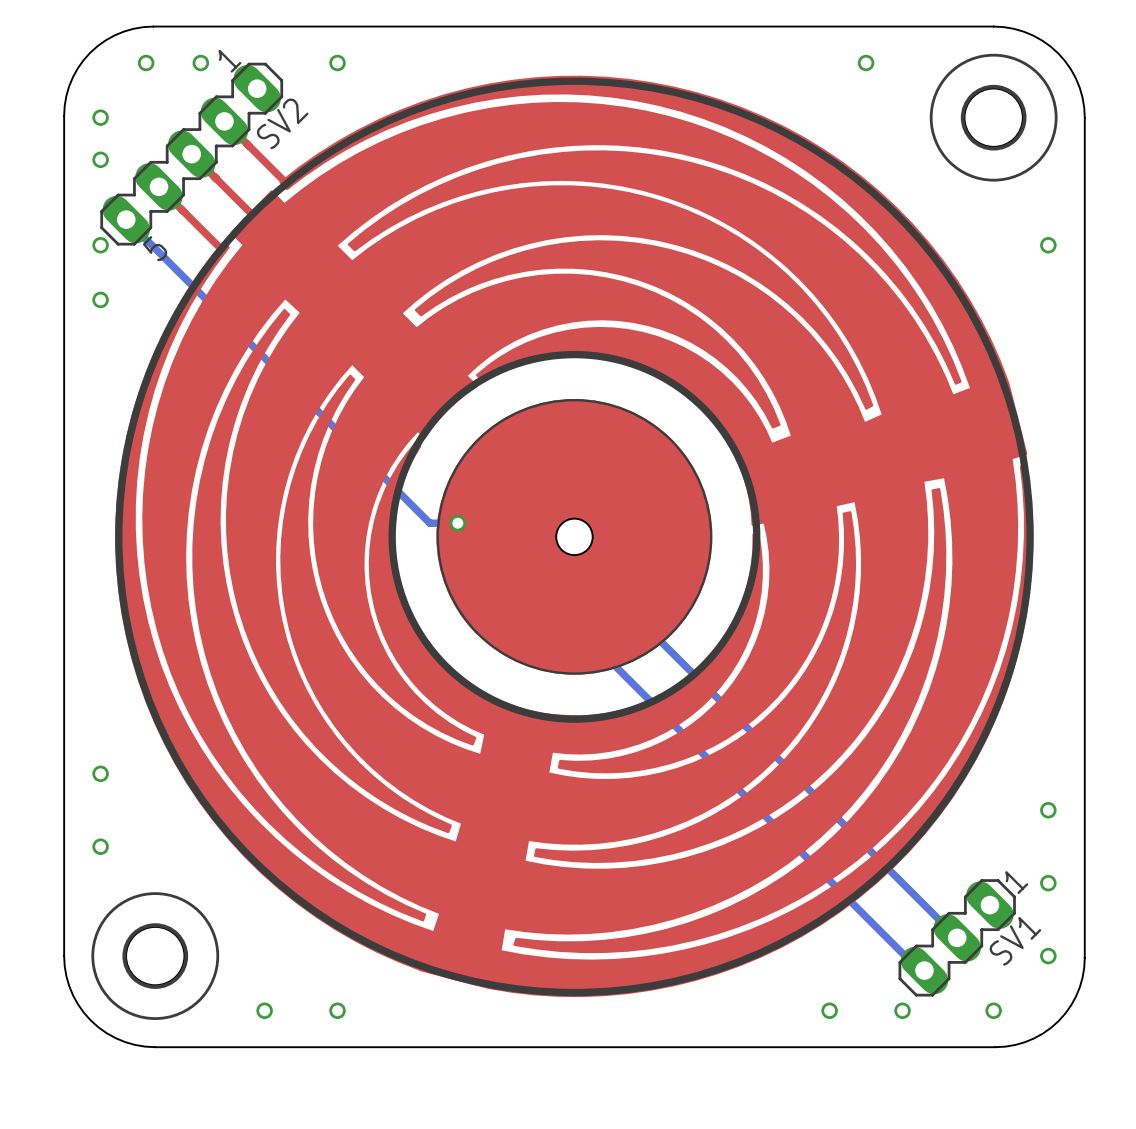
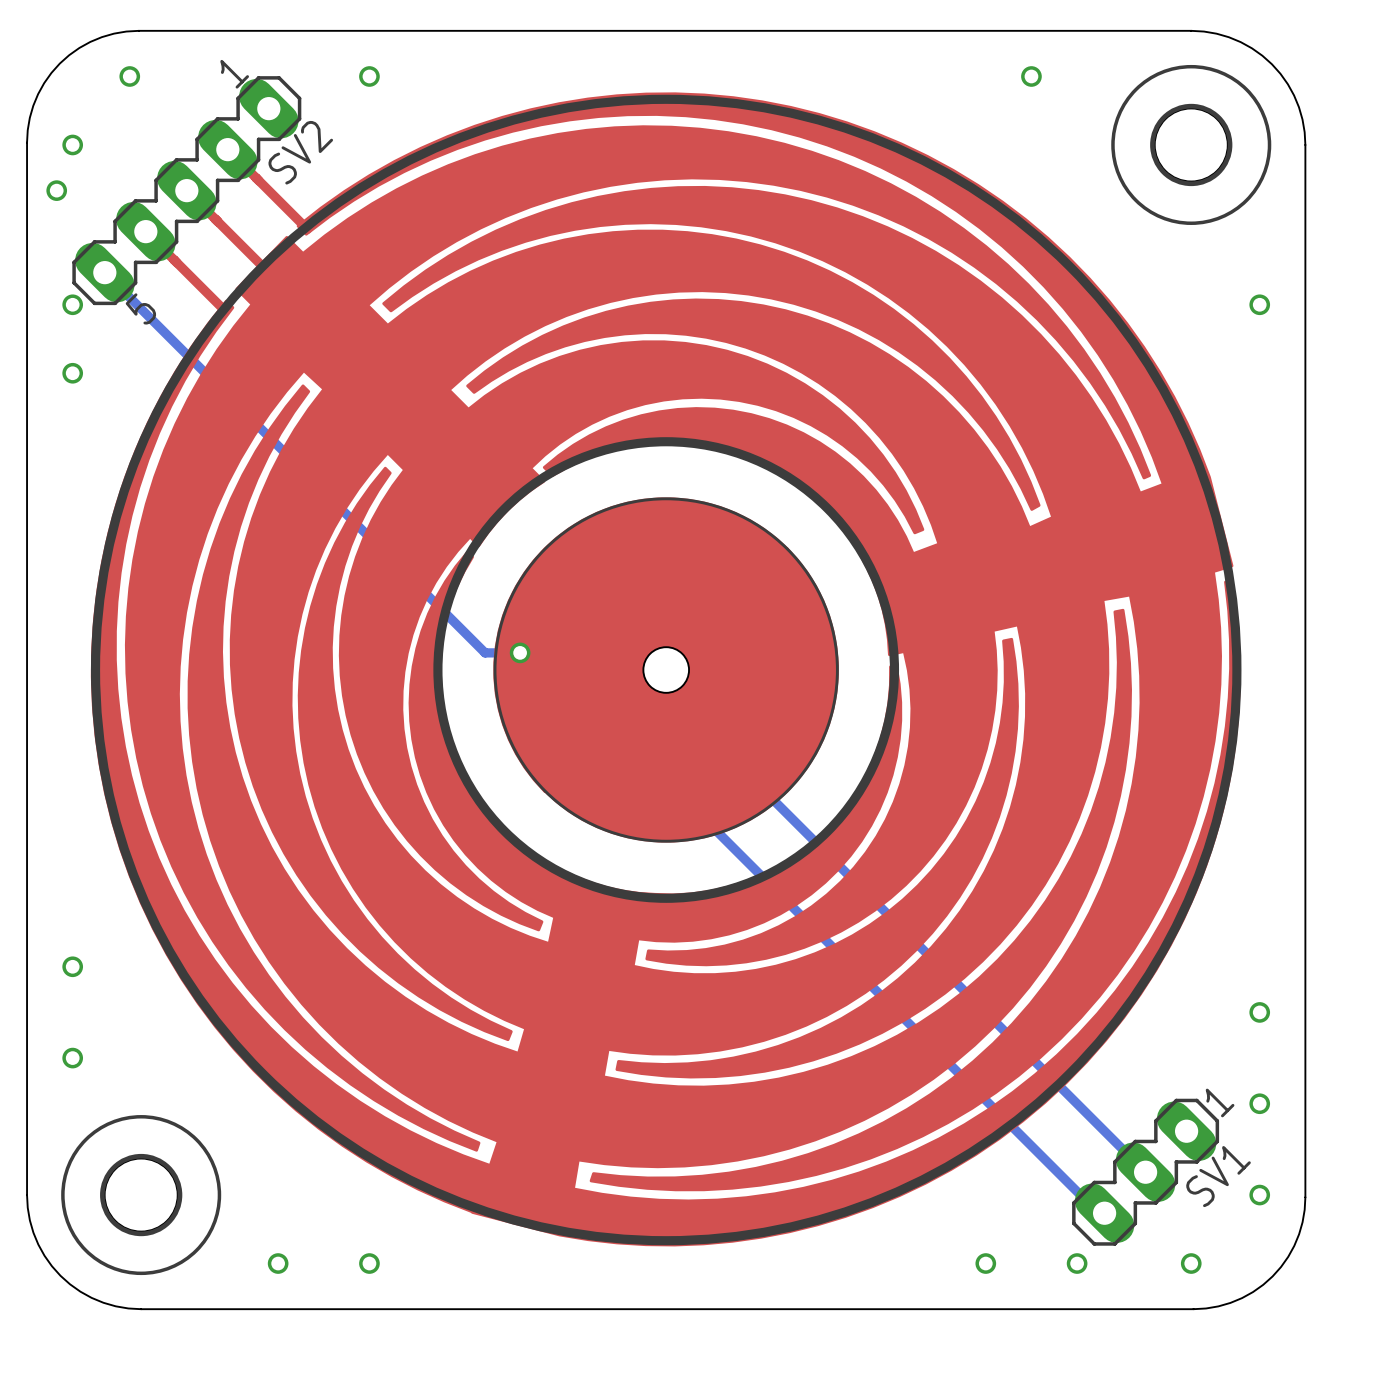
via: (200, 63) -> none
via position: (100, 159) -> (56, 190)

